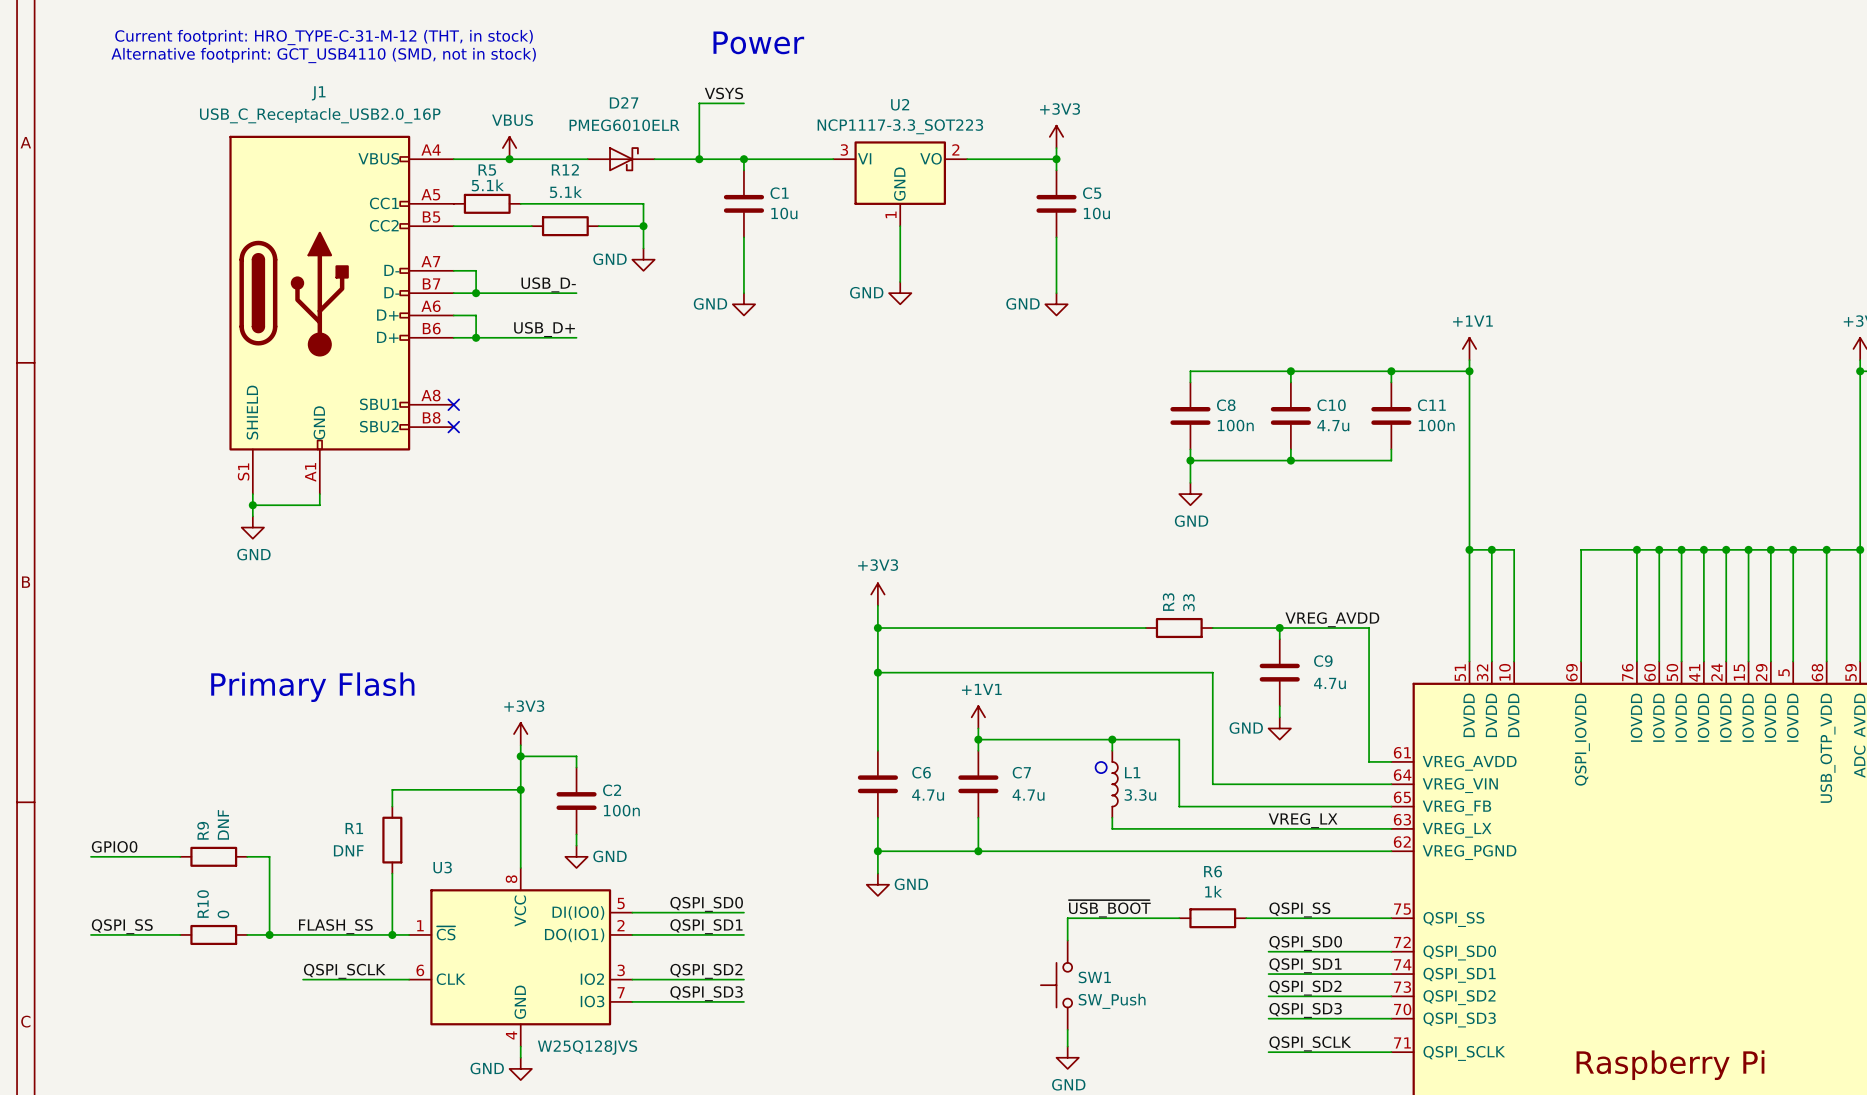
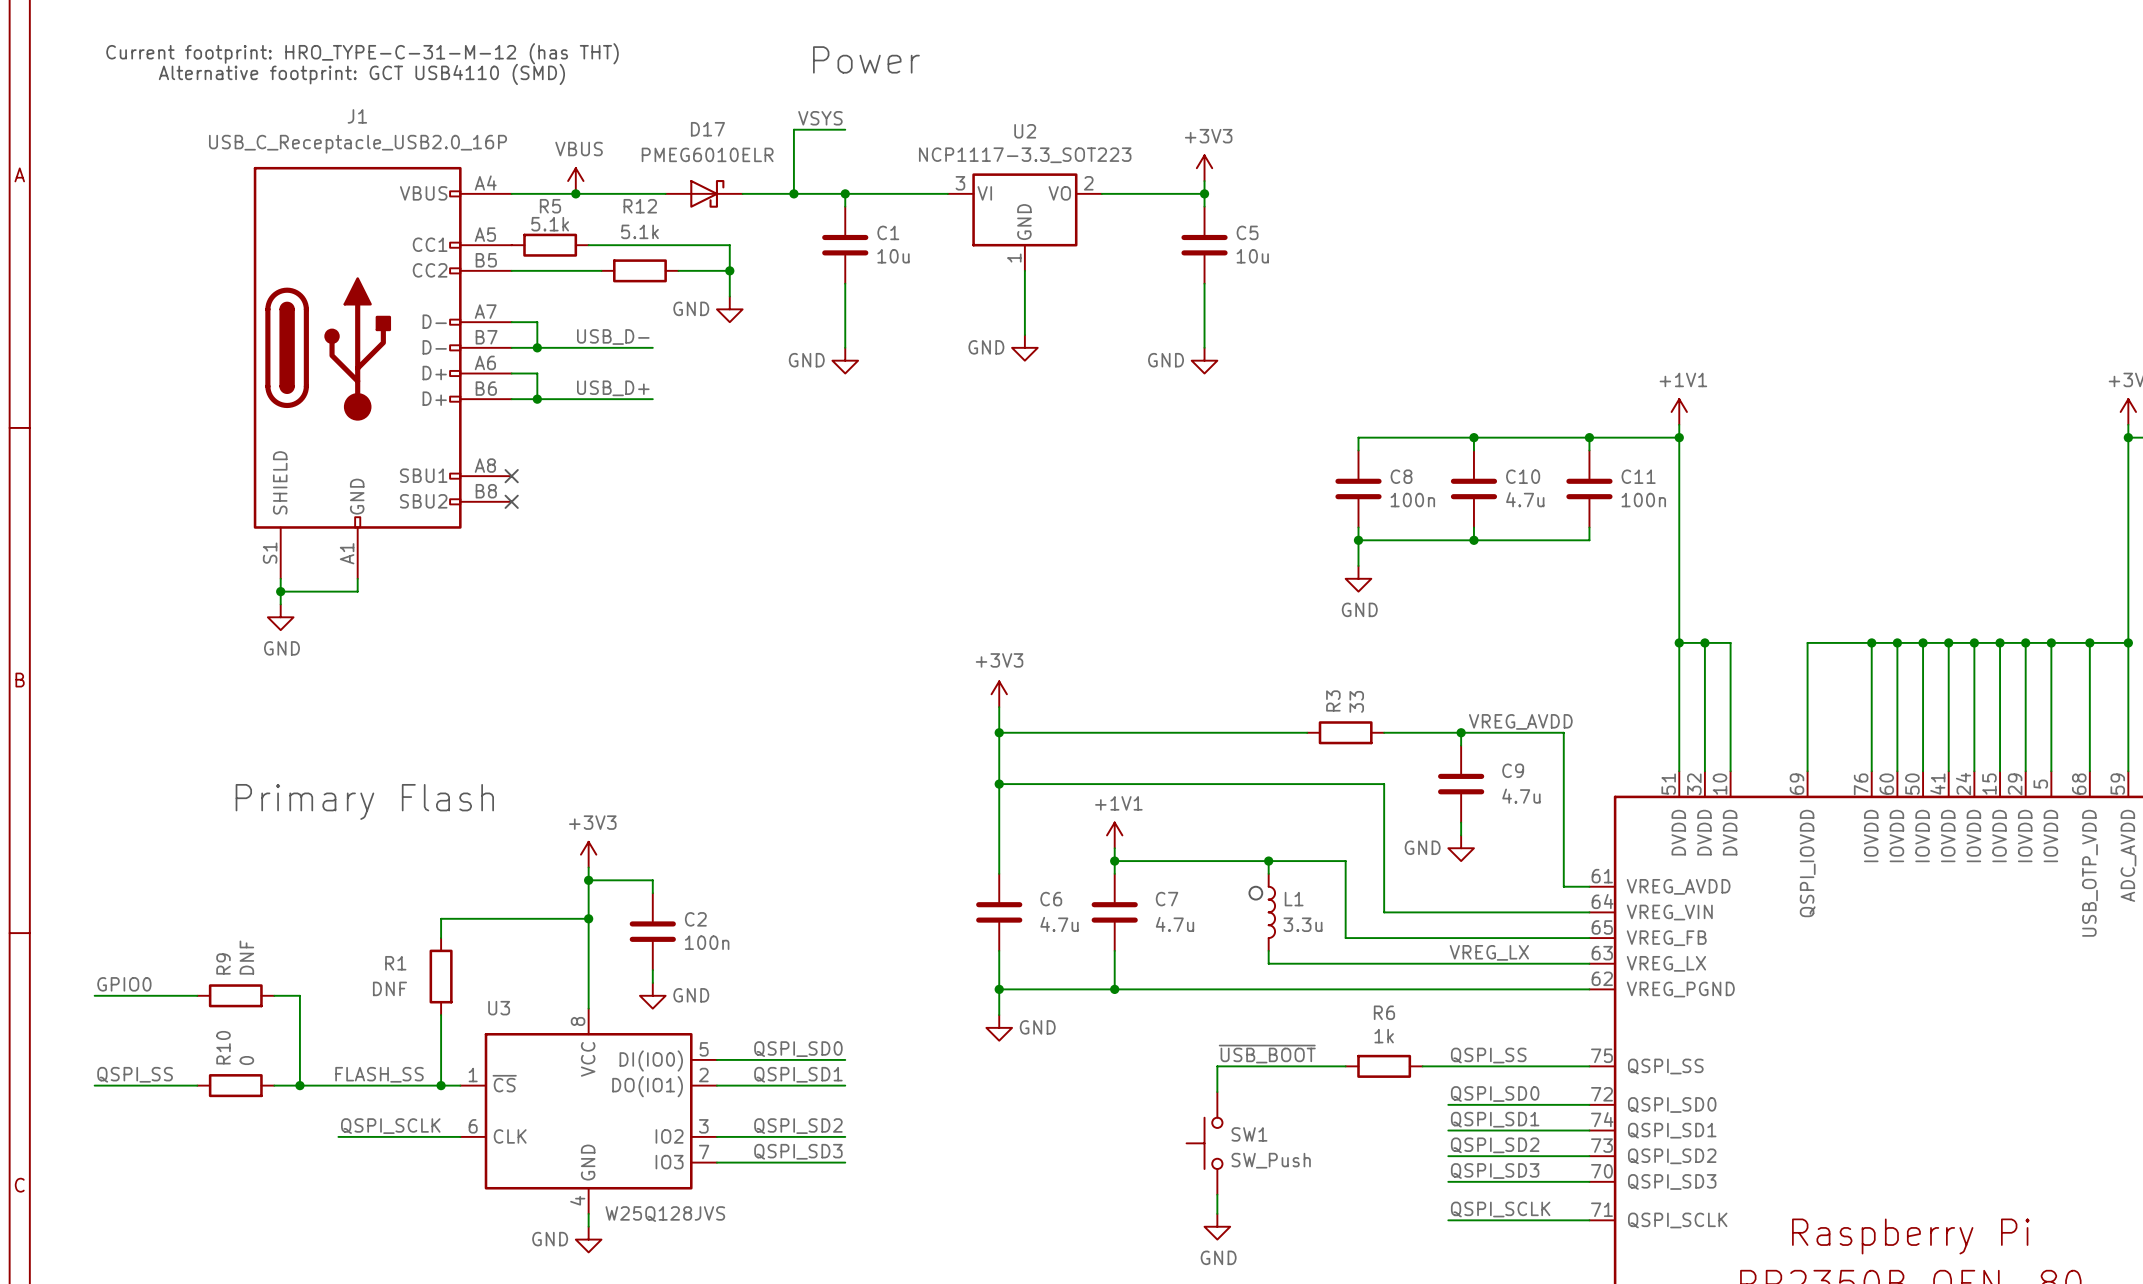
text: Current footprint: HRO_TYPE-C-31-M-12 (THT, in stock) (324, 37) -> Current footprint: HRO_TYPE-C-31-M-12 (has THT) (362, 53)
text: Alternative footprint: GCT_USB4110 (SMD, not in stock) (323, 55) -> Alternative footprint: GCT USB4110 (SMD) (361, 74)
D27 name: D27 (624, 102) -> D17 (707, 129)

